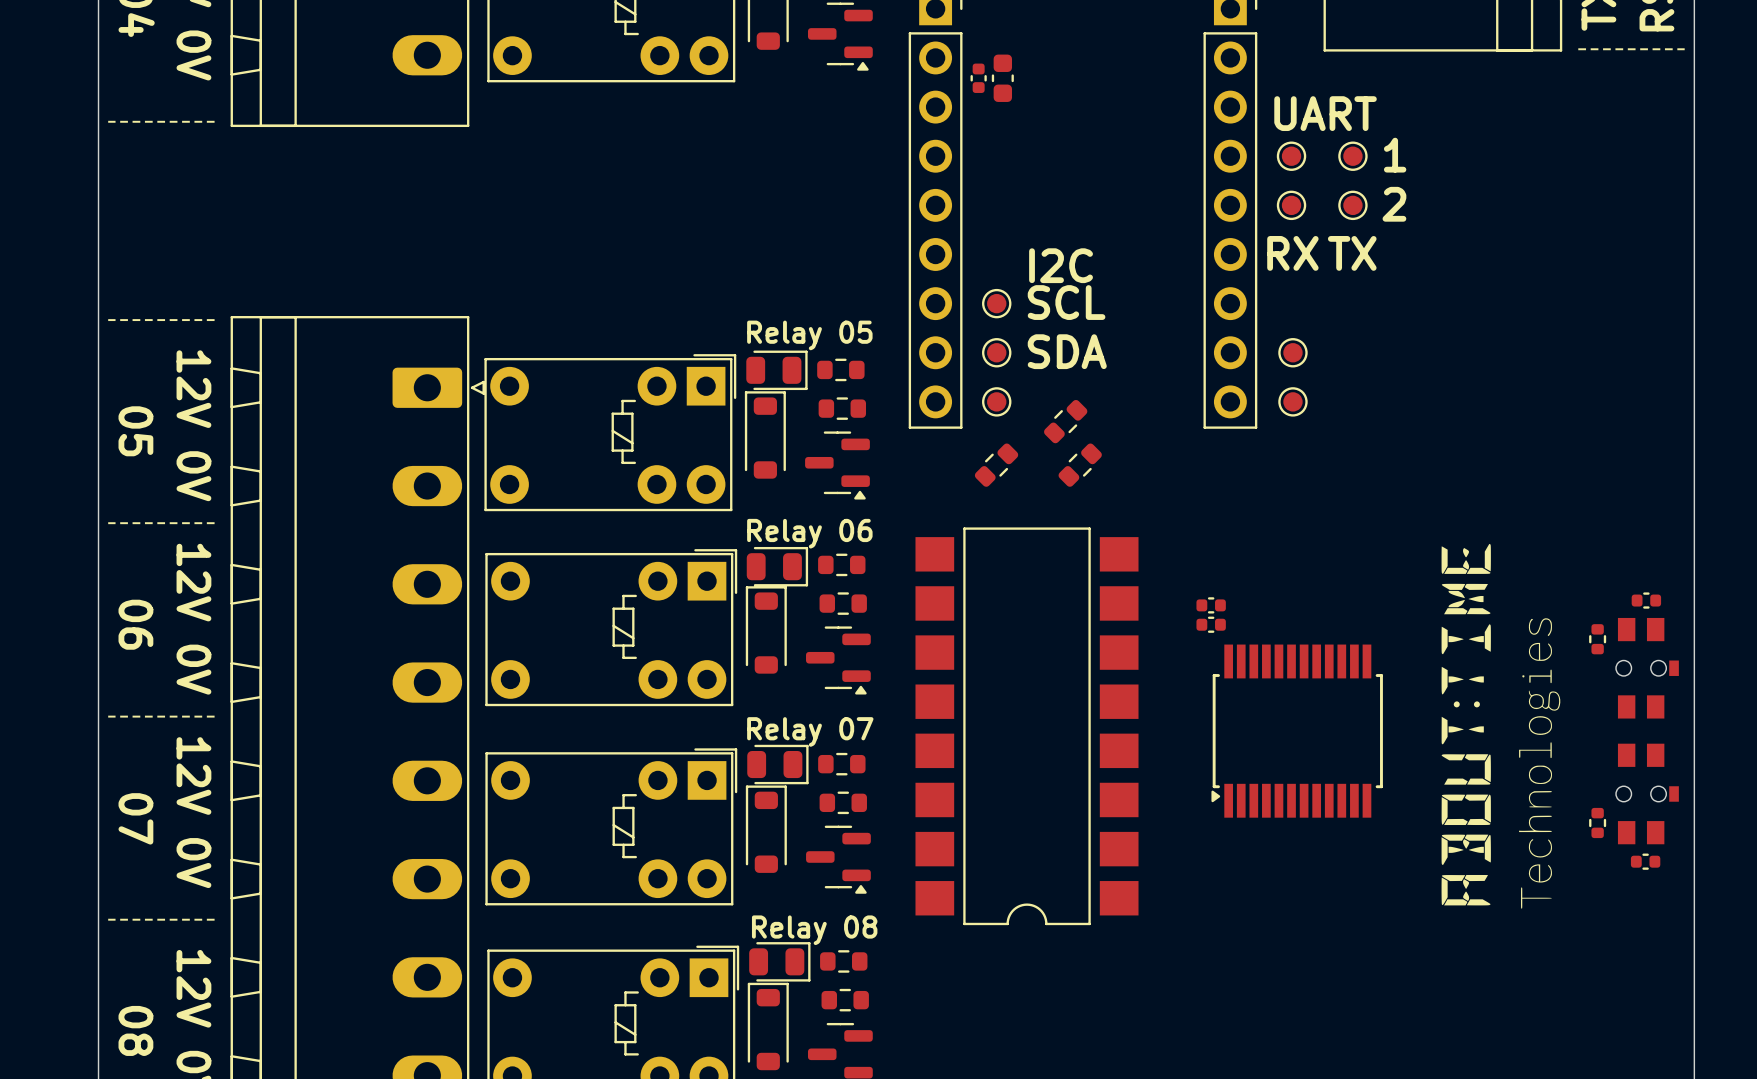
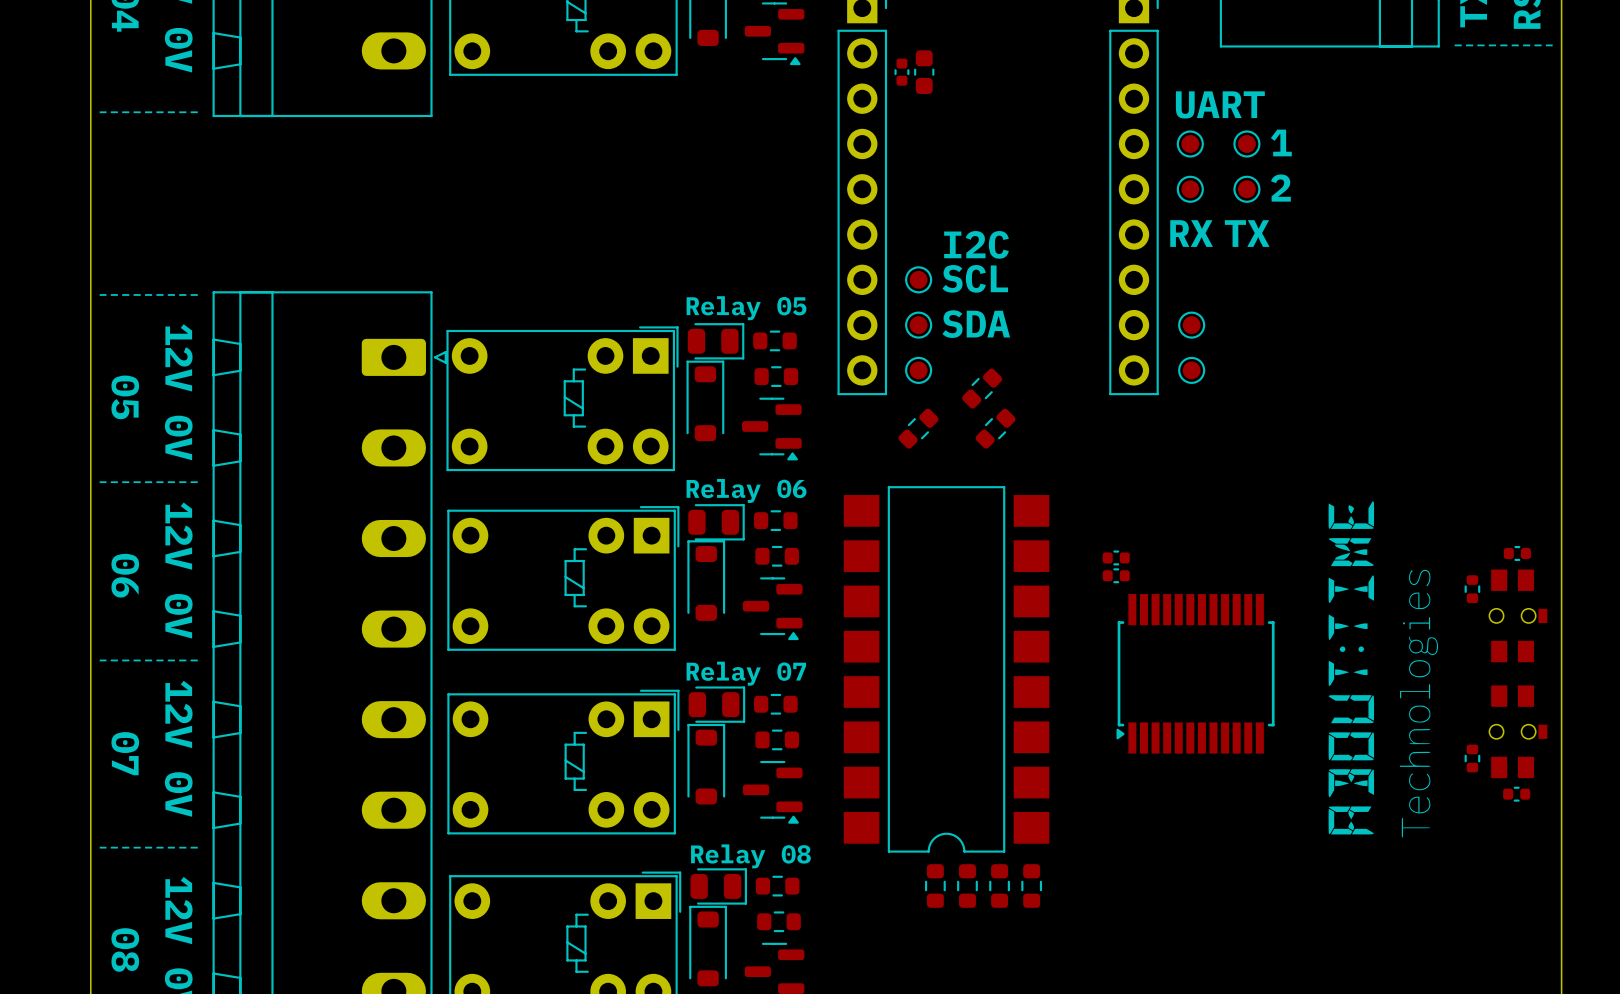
part: none -> (935, 885)
part: none -> (967, 885)
part: none -> (999, 885)
part: none -> (1031, 885)

